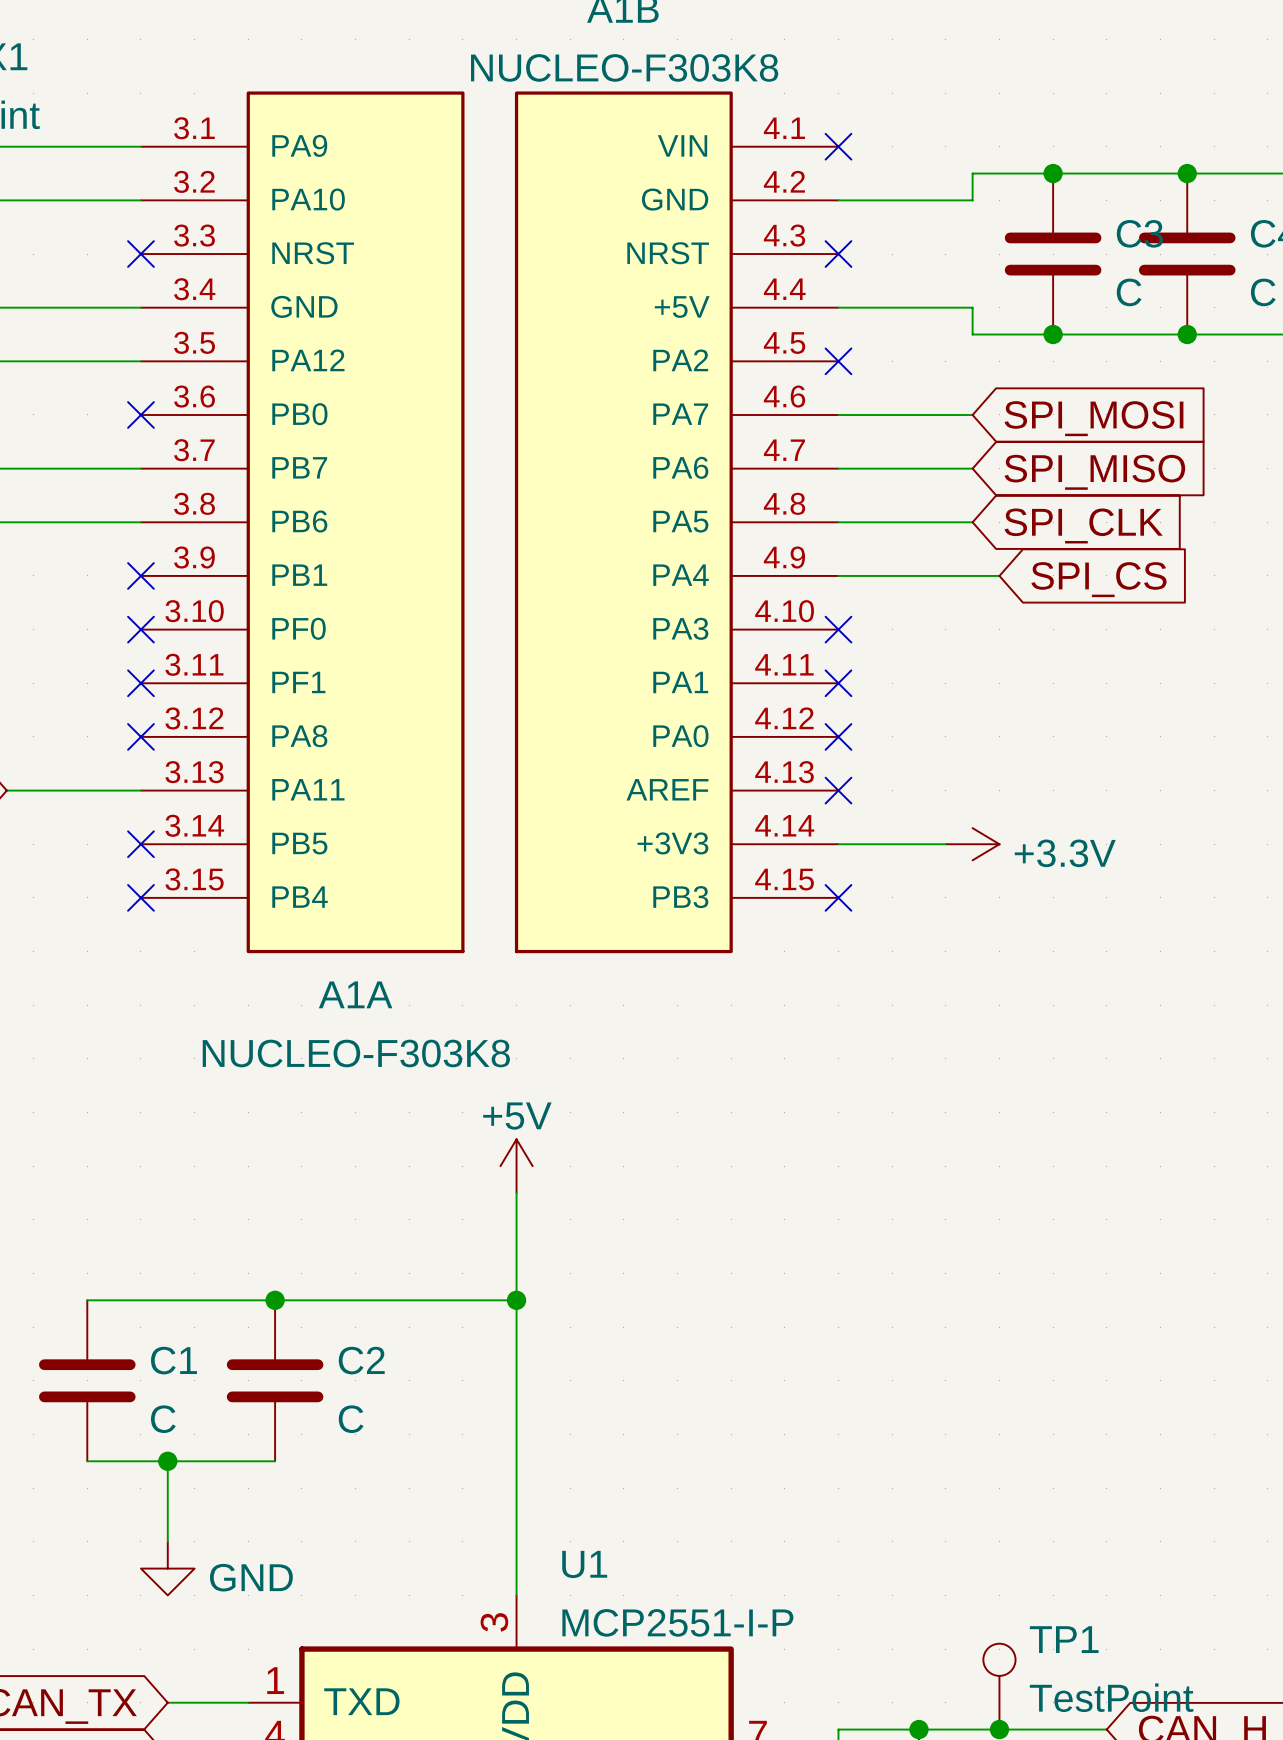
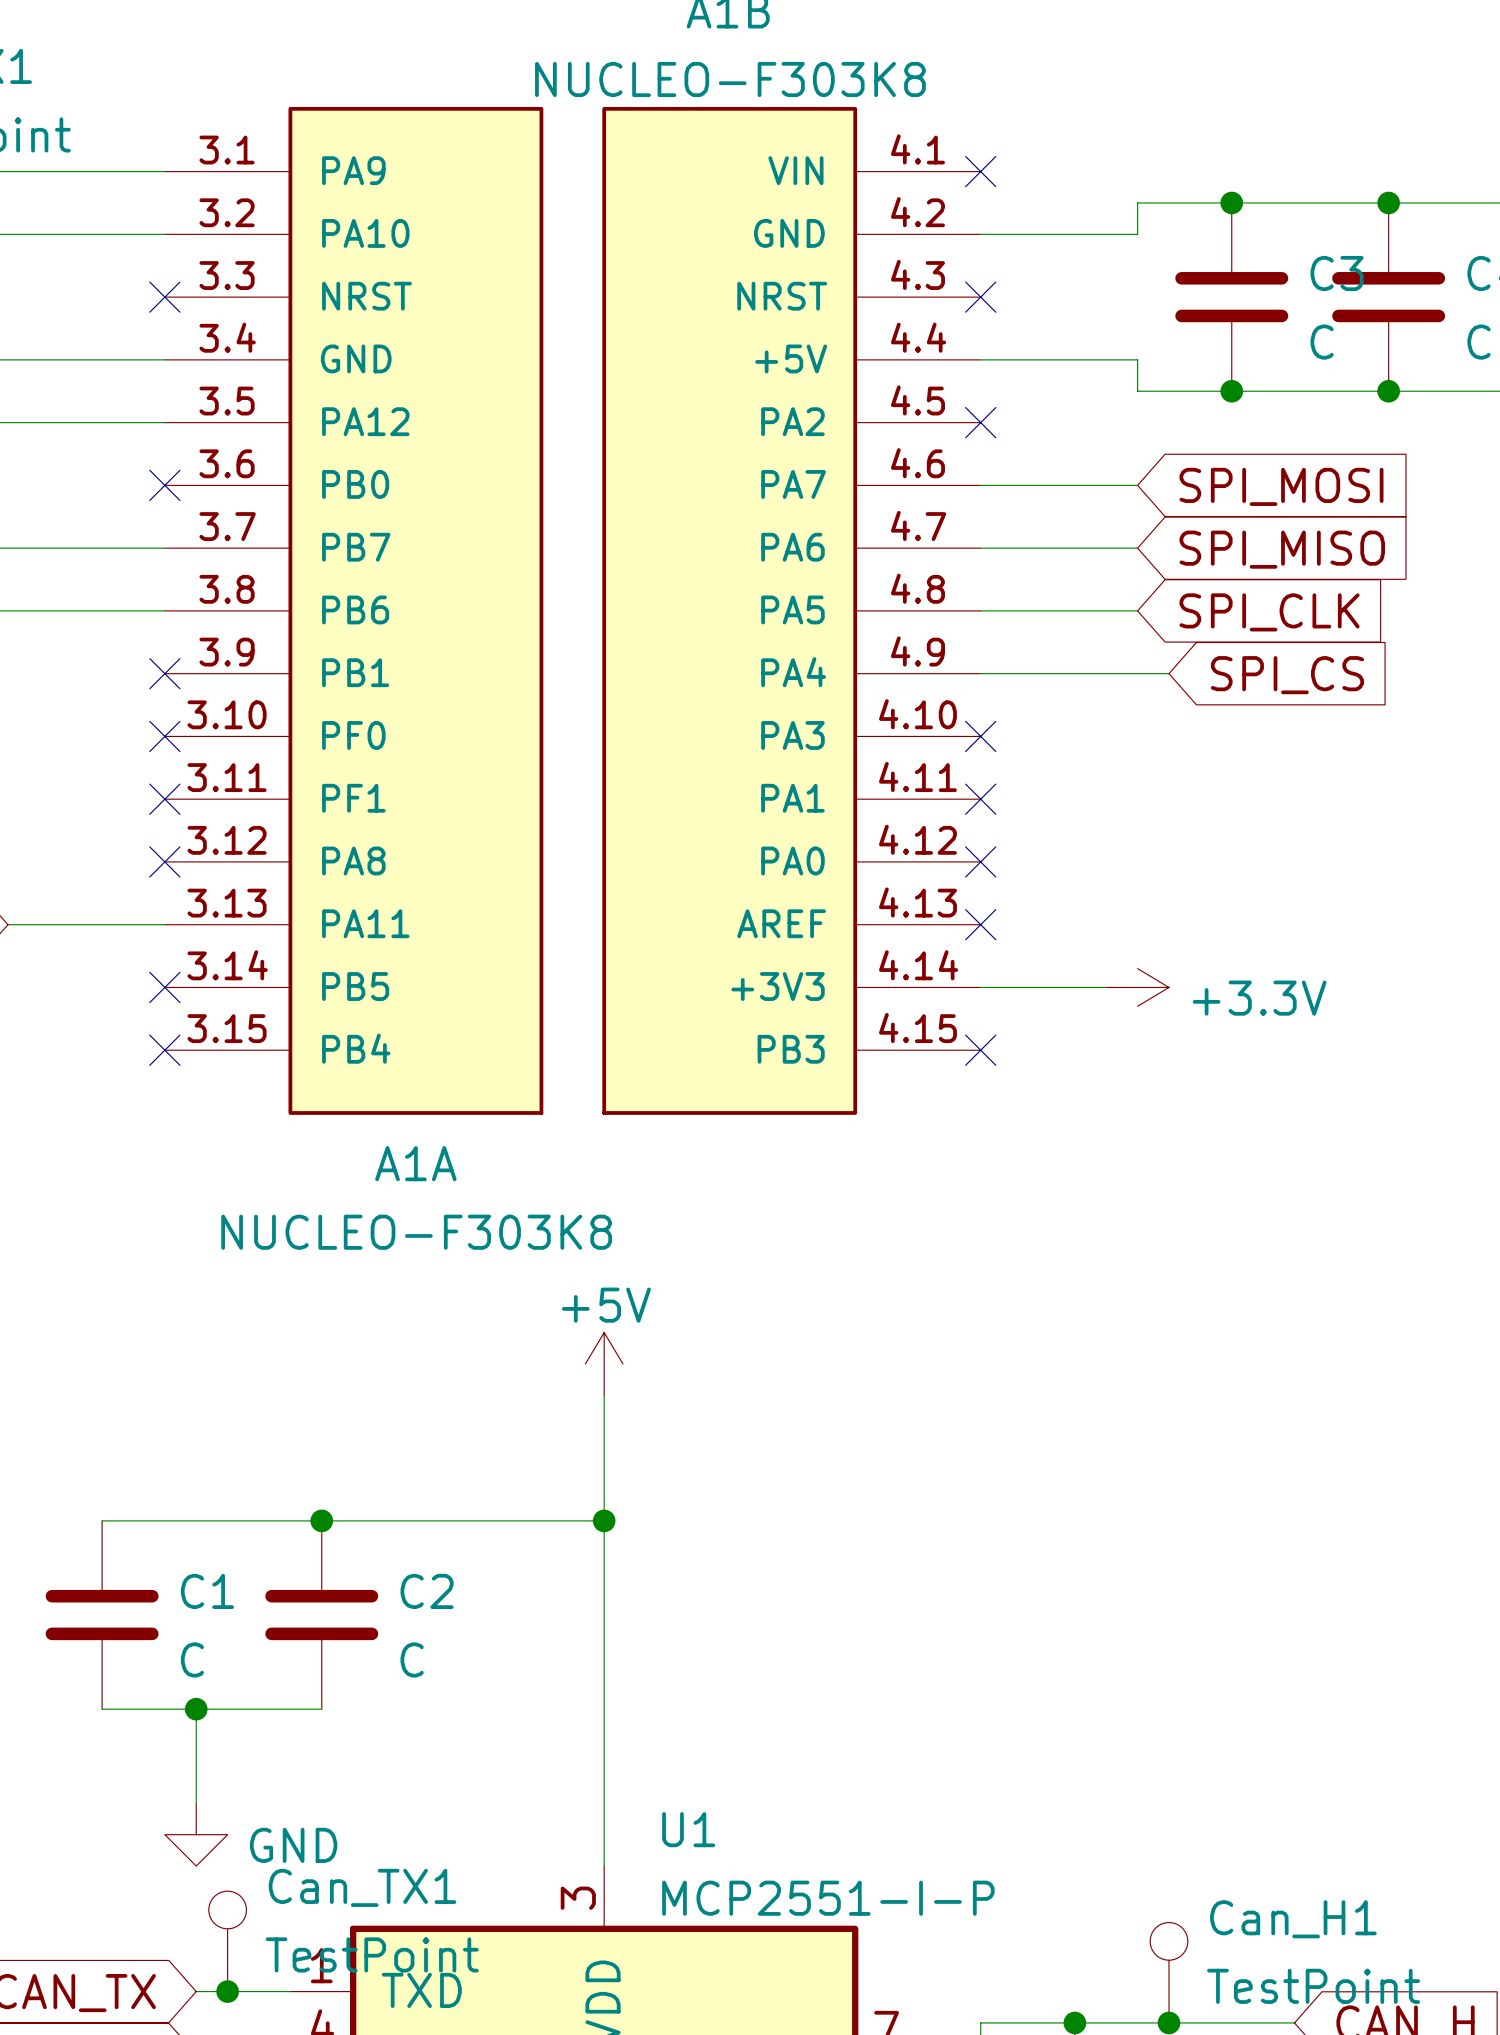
TP1 name: TP1 (1064, 1639) -> Can_H1 (1293, 1919)
Can_TX1: none -> TestPoint (227, 1941)
junction: none -> (227, 1991)

